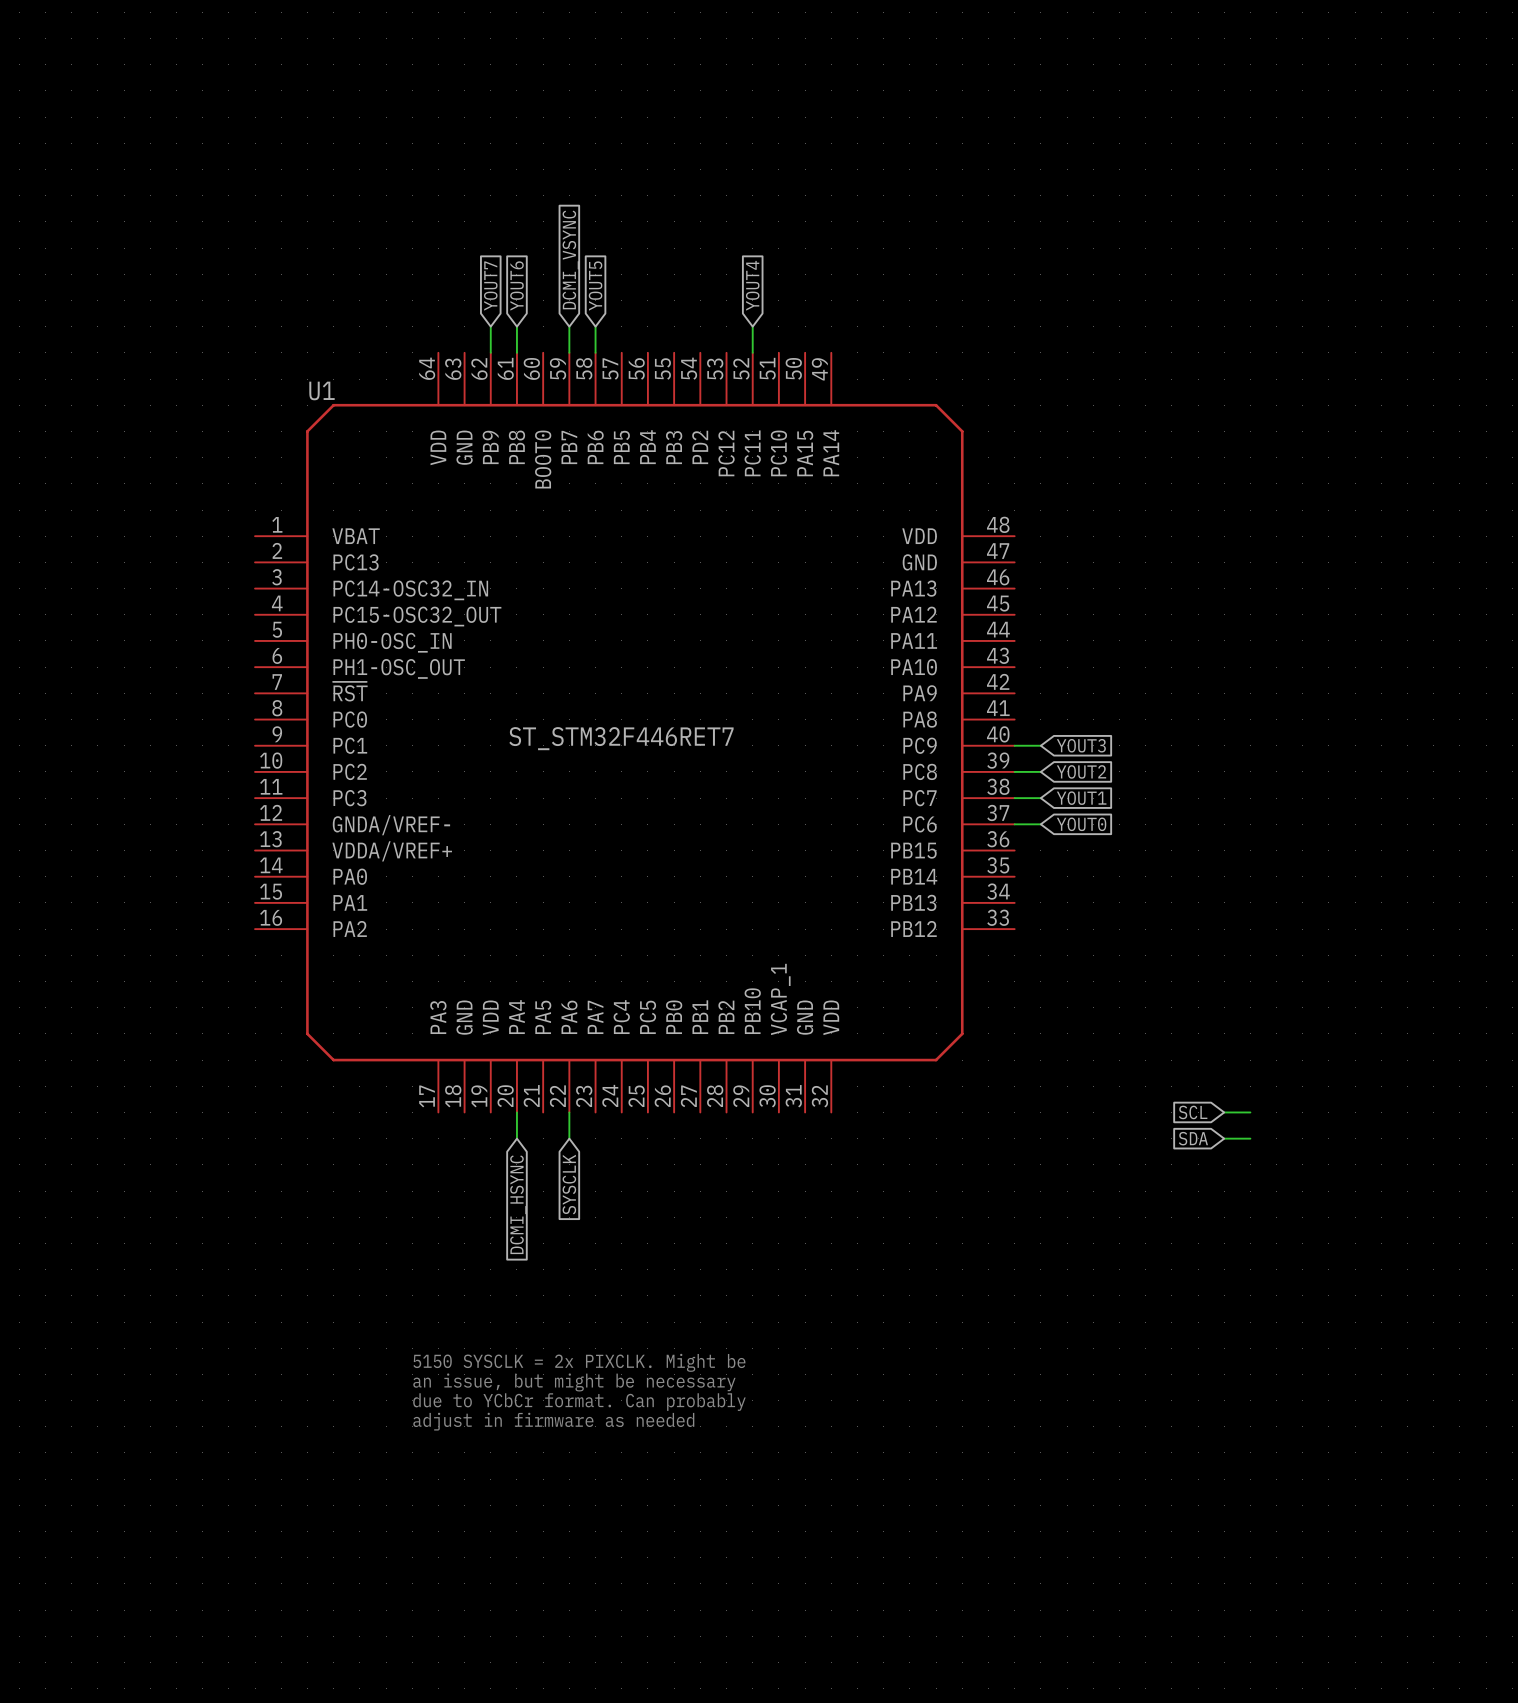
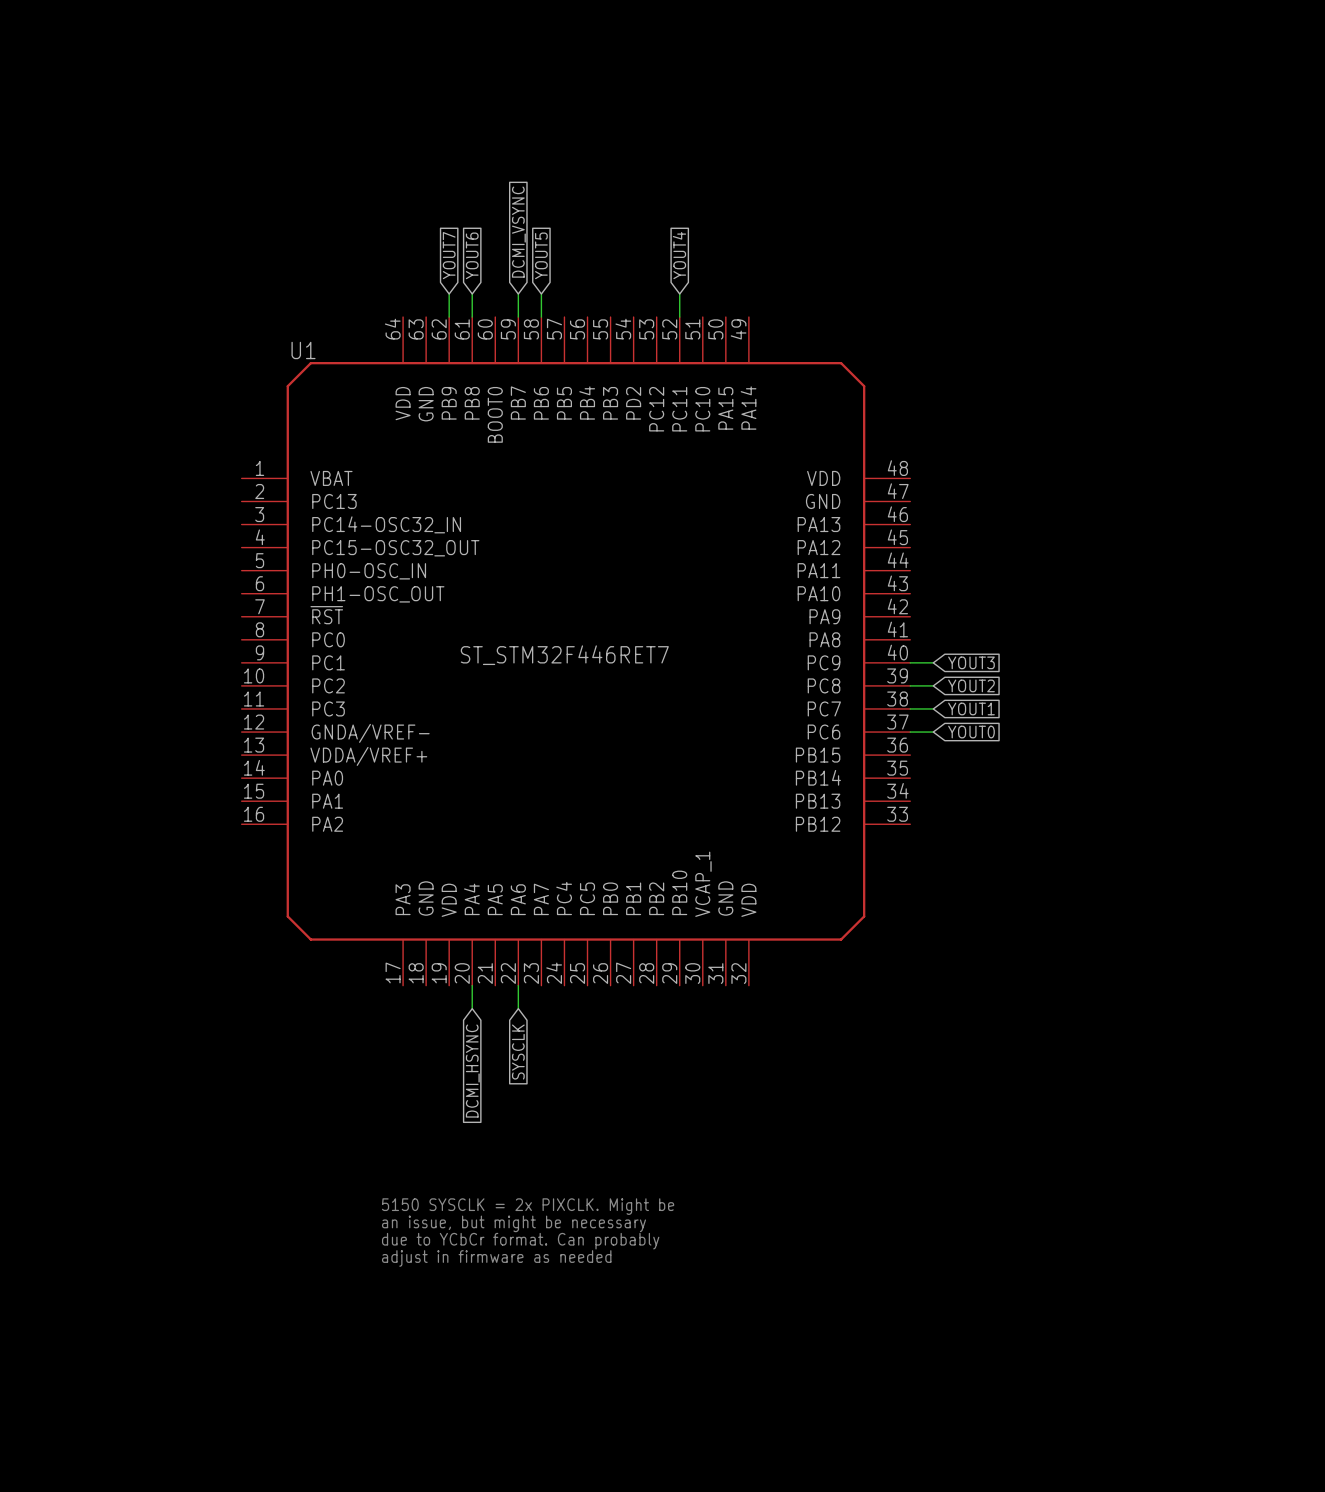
global label: SCL (1193, 1112) -> none
wire: (1224, 1112) (1250, 1112) -> none
global label: SDA (1193, 1138) -> none
wire: (1224, 1138) (1250, 1138) -> none

